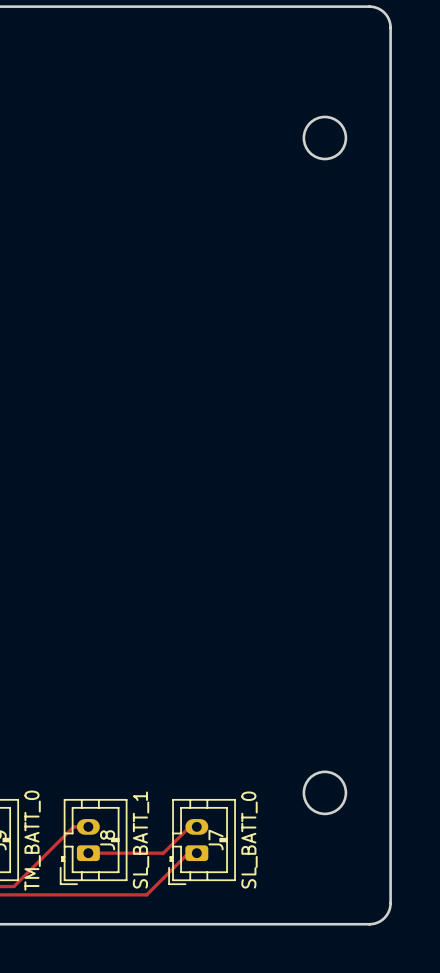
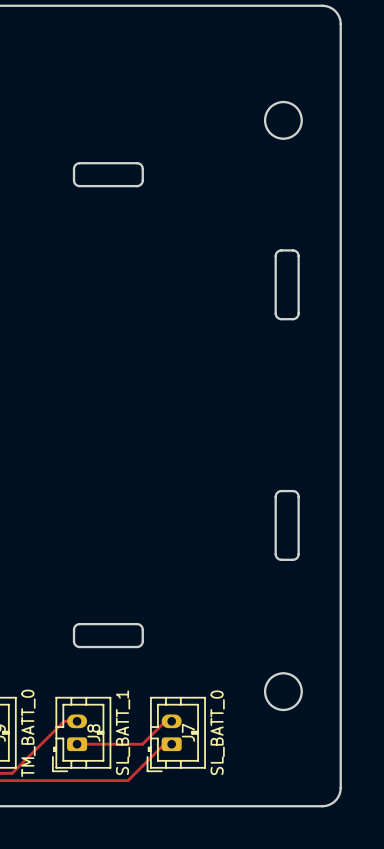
board edge: none -> (79, 163) (138, 163) (142, 167) (142, 181) (137, 186) (78, 185) (74, 181) (74, 168) (75, 164) (79, 163)
board edge: none -> (281, 250) (294, 250) (298, 255) (298, 314) (293, 319) (279, 318) (275, 314) (275, 255) (281, 250)
board edge: none -> (281, 491) (294, 491) (298, 496) (298, 554) (293, 559) (279, 559) (275, 554) (275, 496) (281, 491)
board edge: none -> (79, 624) (138, 624) (142, 628) (142, 642) (137, 647) (78, 646) (74, 642) (74, 629) (75, 625) (79, 624)

